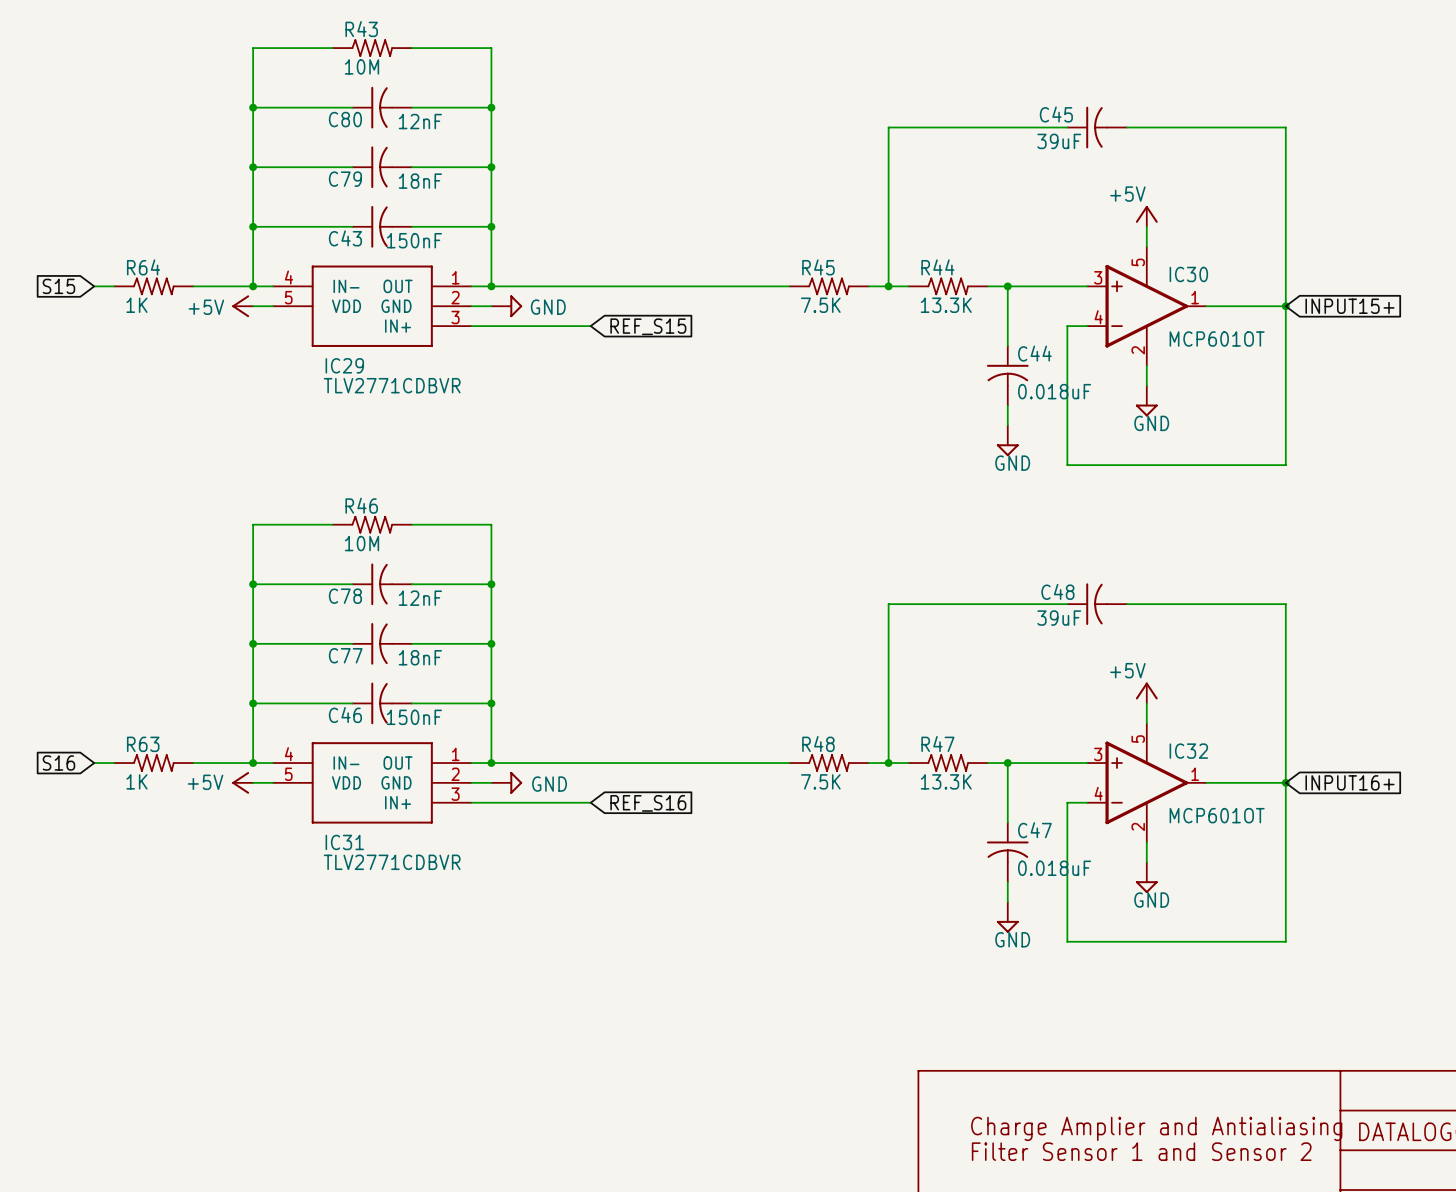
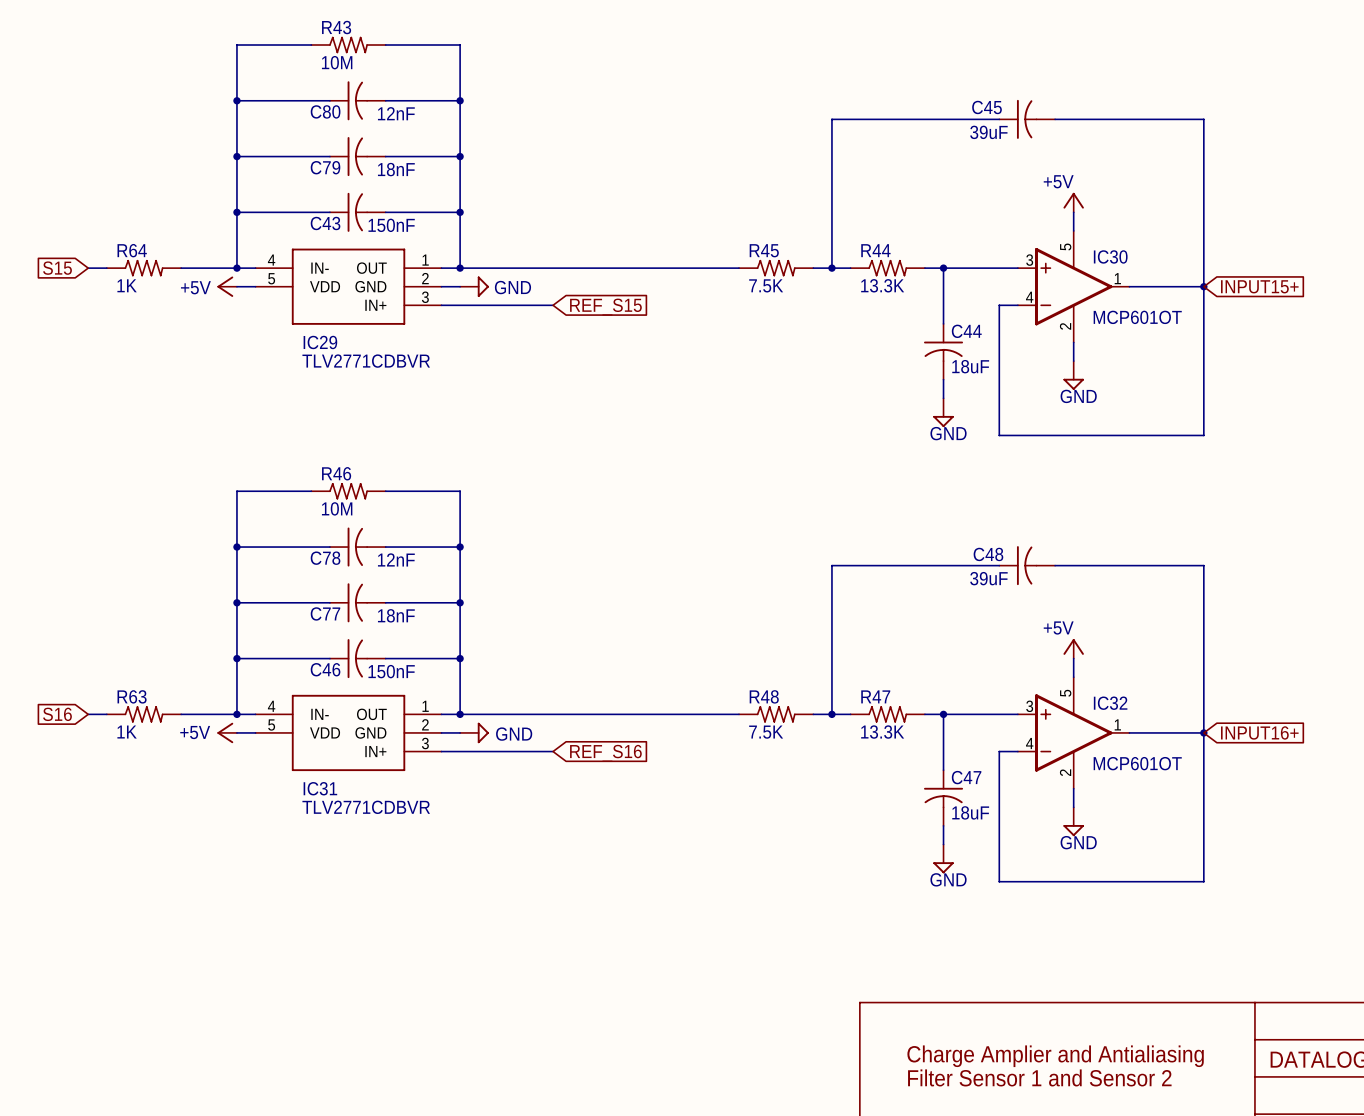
C44 value: 0.018uF (1054, 391) -> 18uF (970, 366)
C47 value: 0.018uF (1054, 868) -> 18uF (970, 812)

